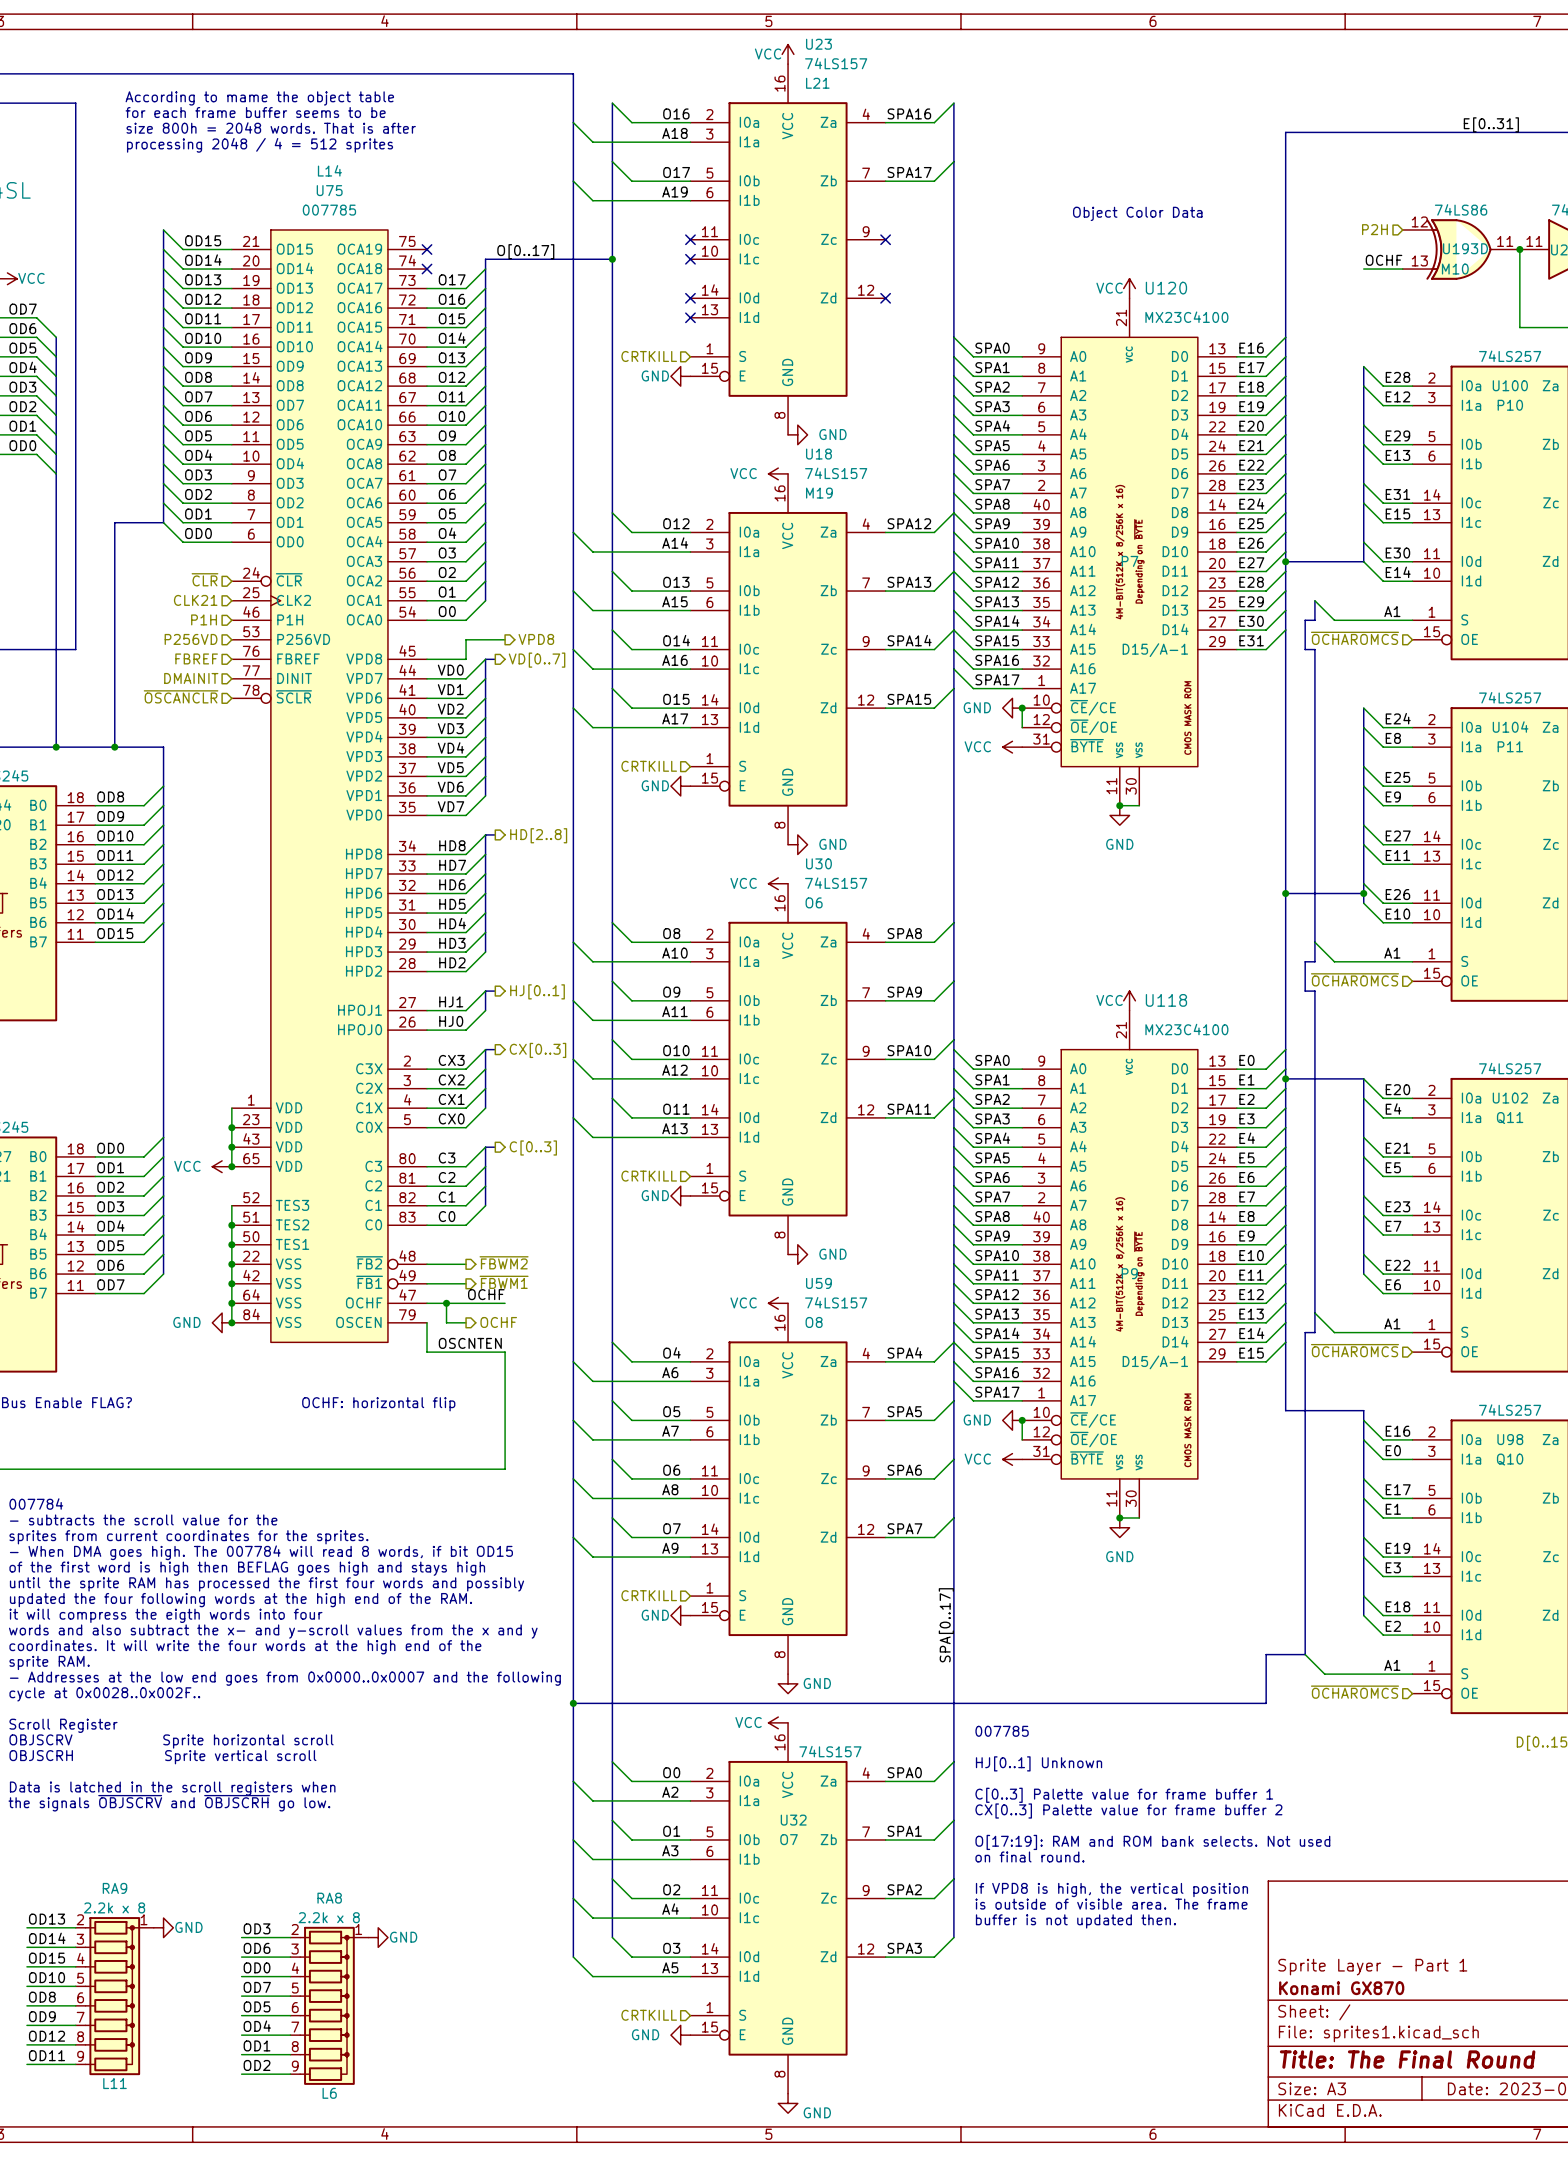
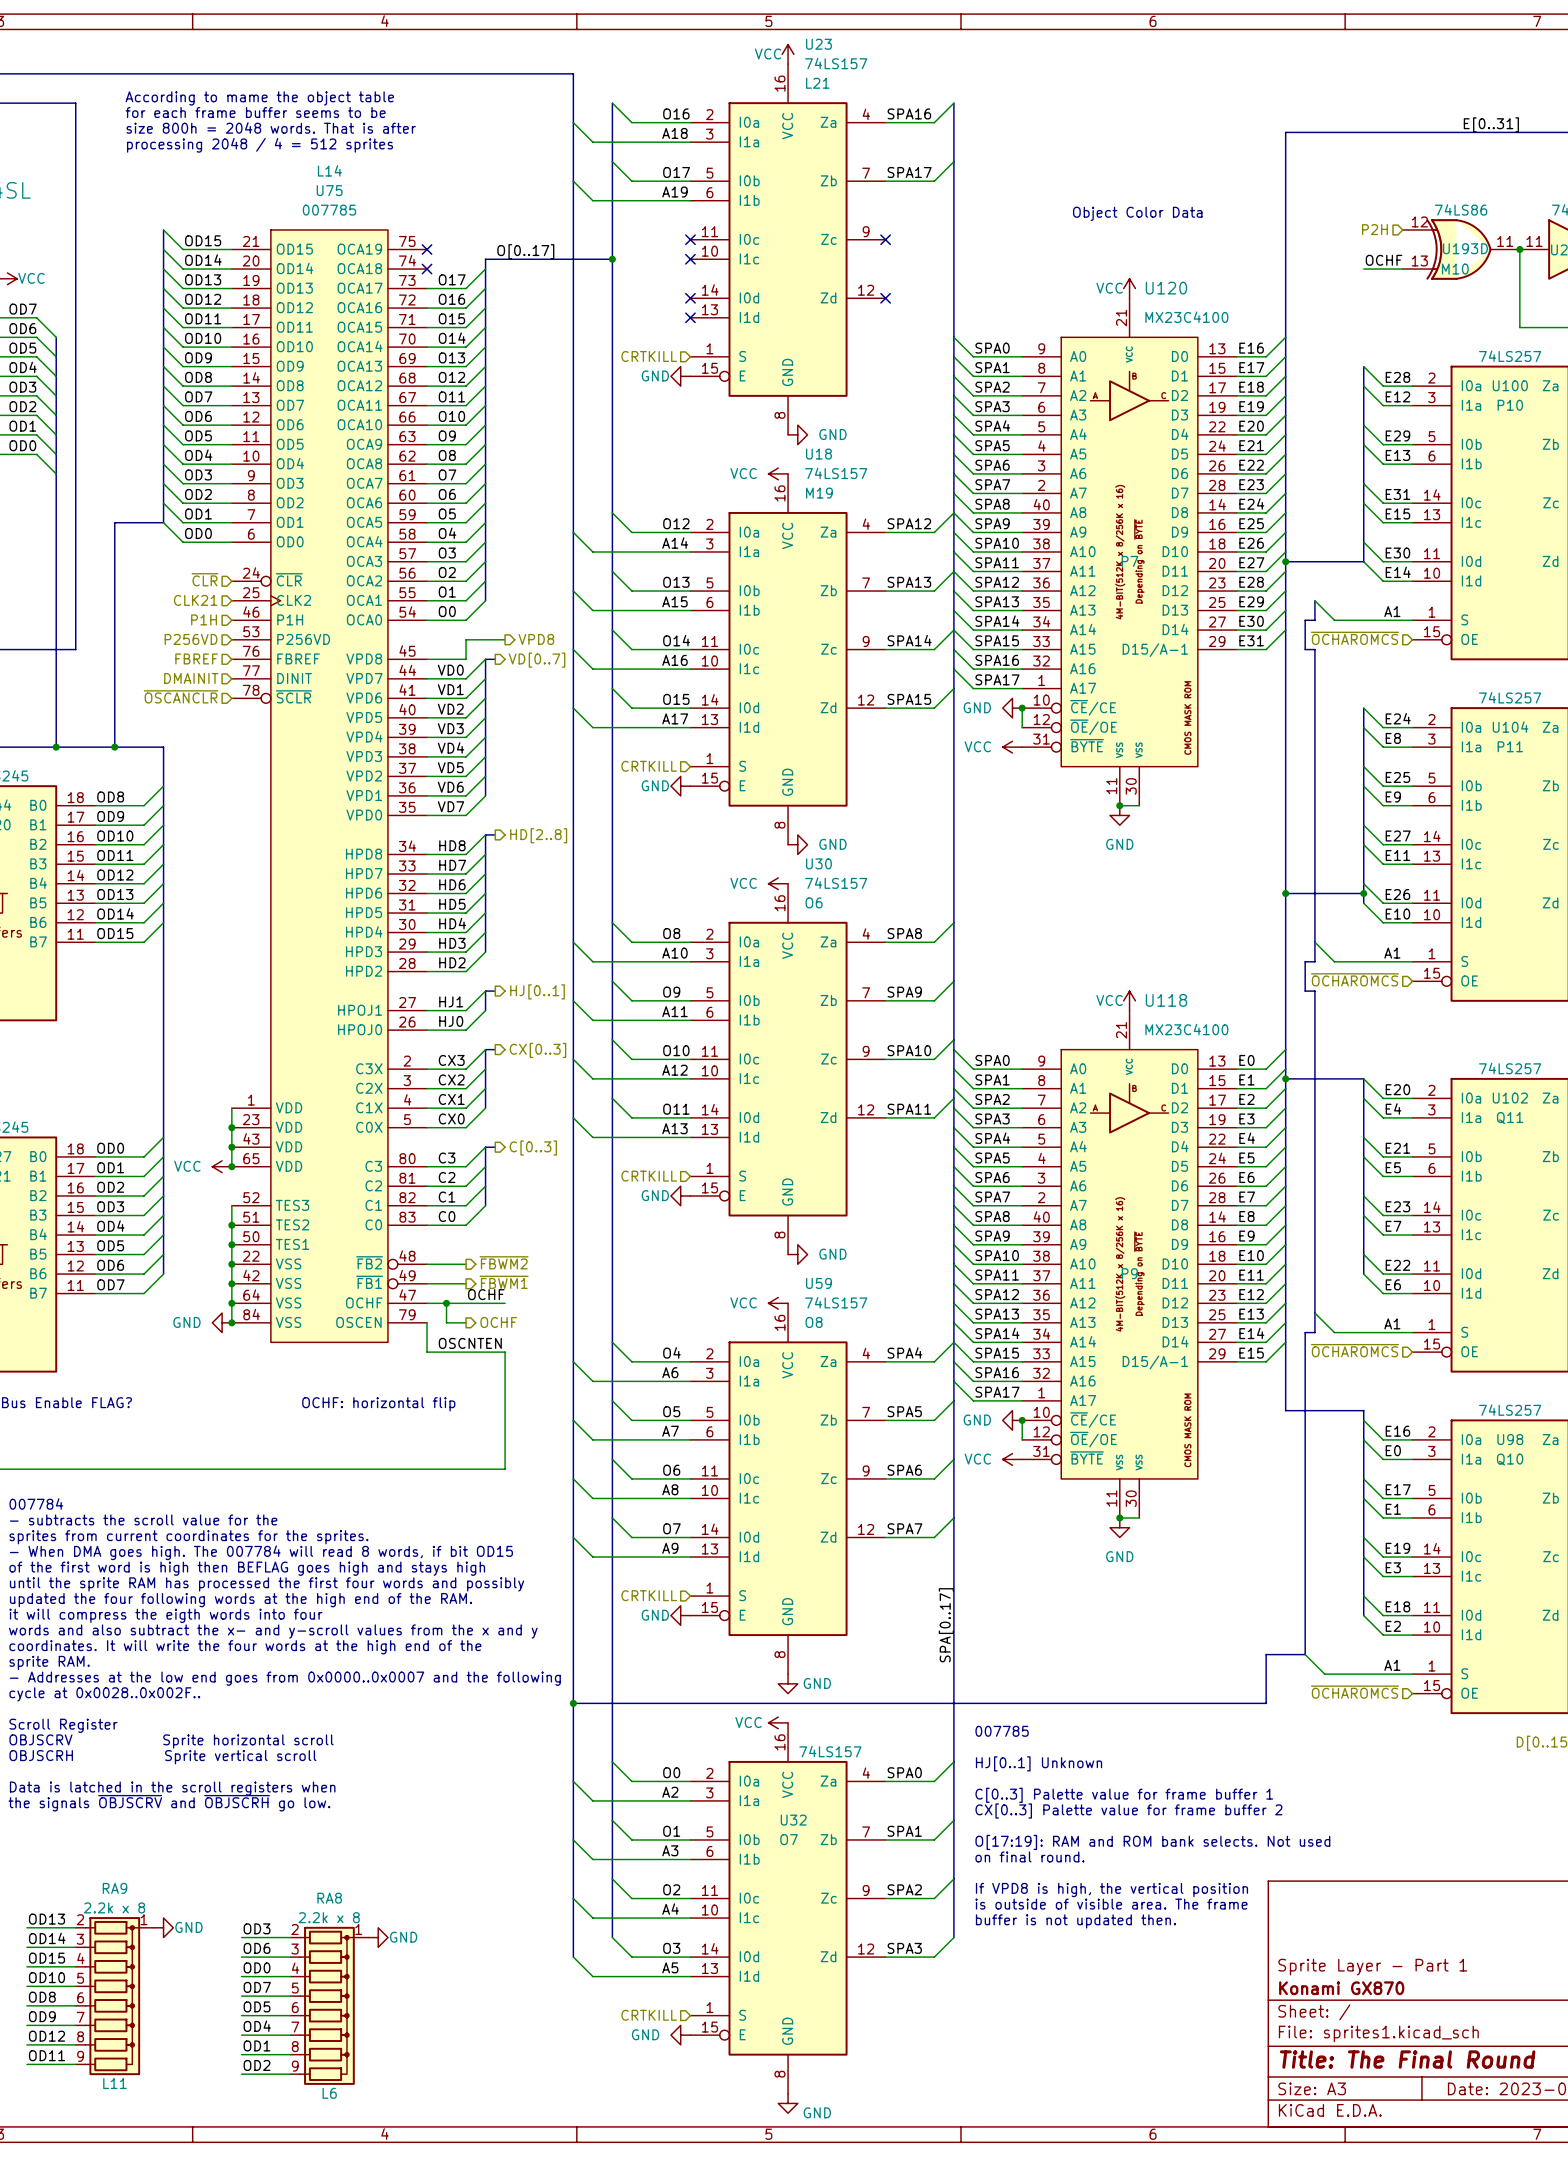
U120 symbol: [1022, 298, 1237, 806] -> [1022, 298, 1237, 806]
U118 symbol: [1022, 1010, 1237, 1518] -> [1022, 1010, 1237, 1518]

